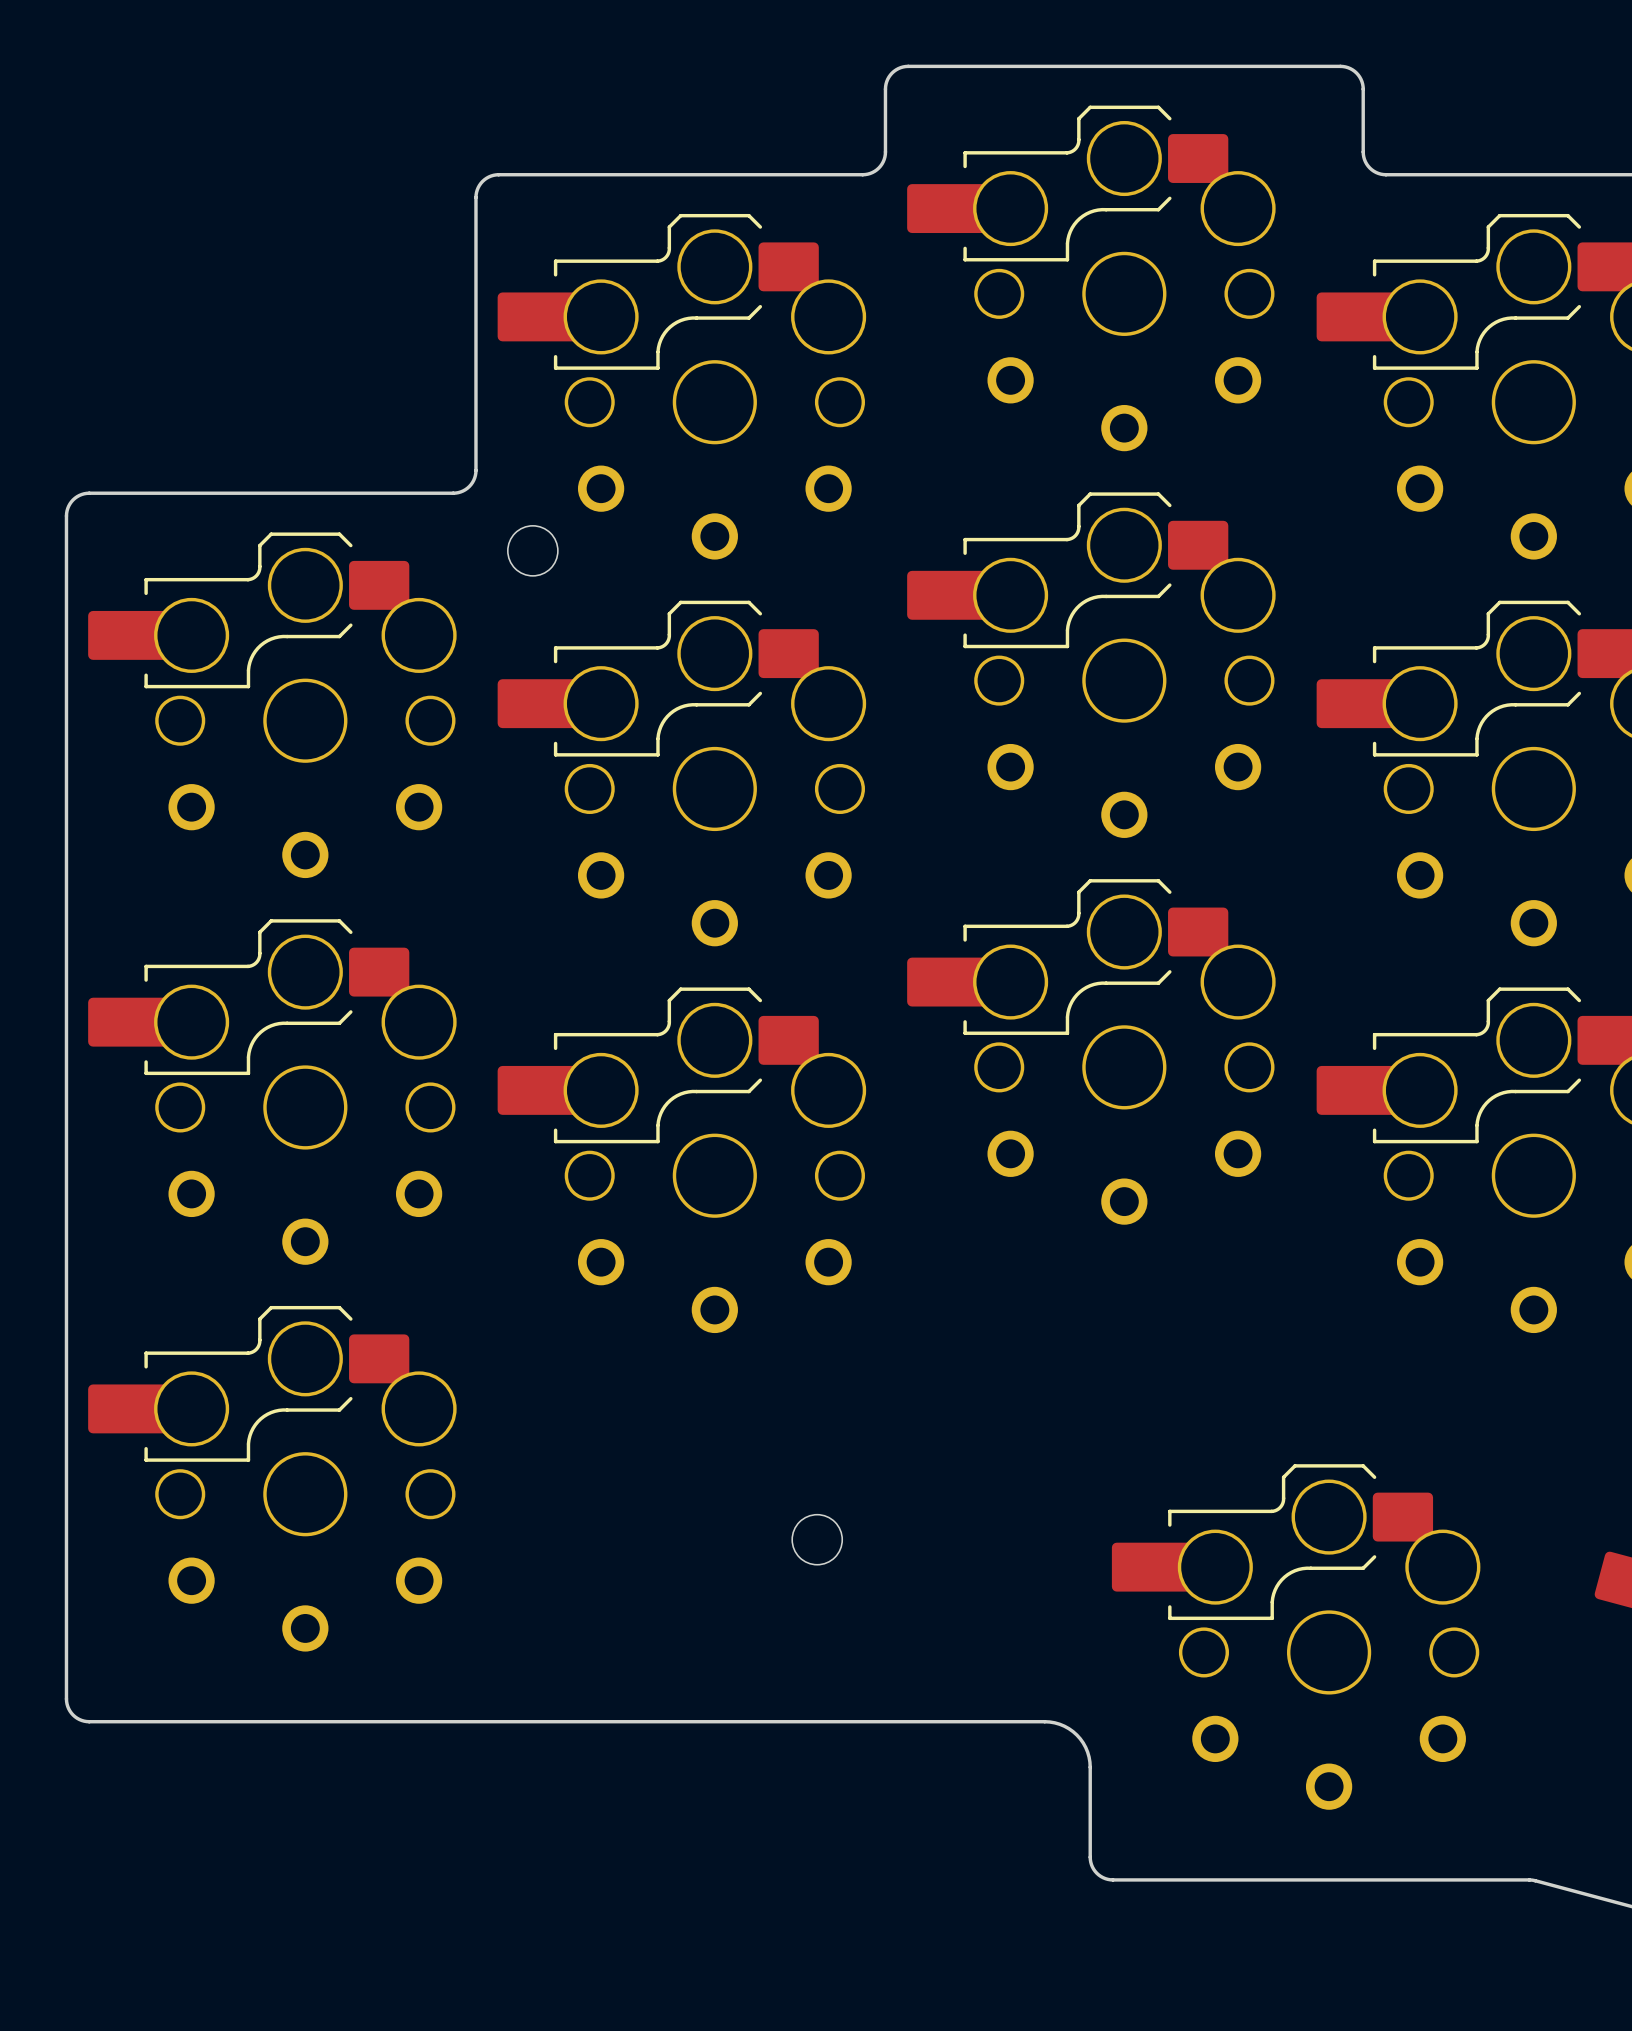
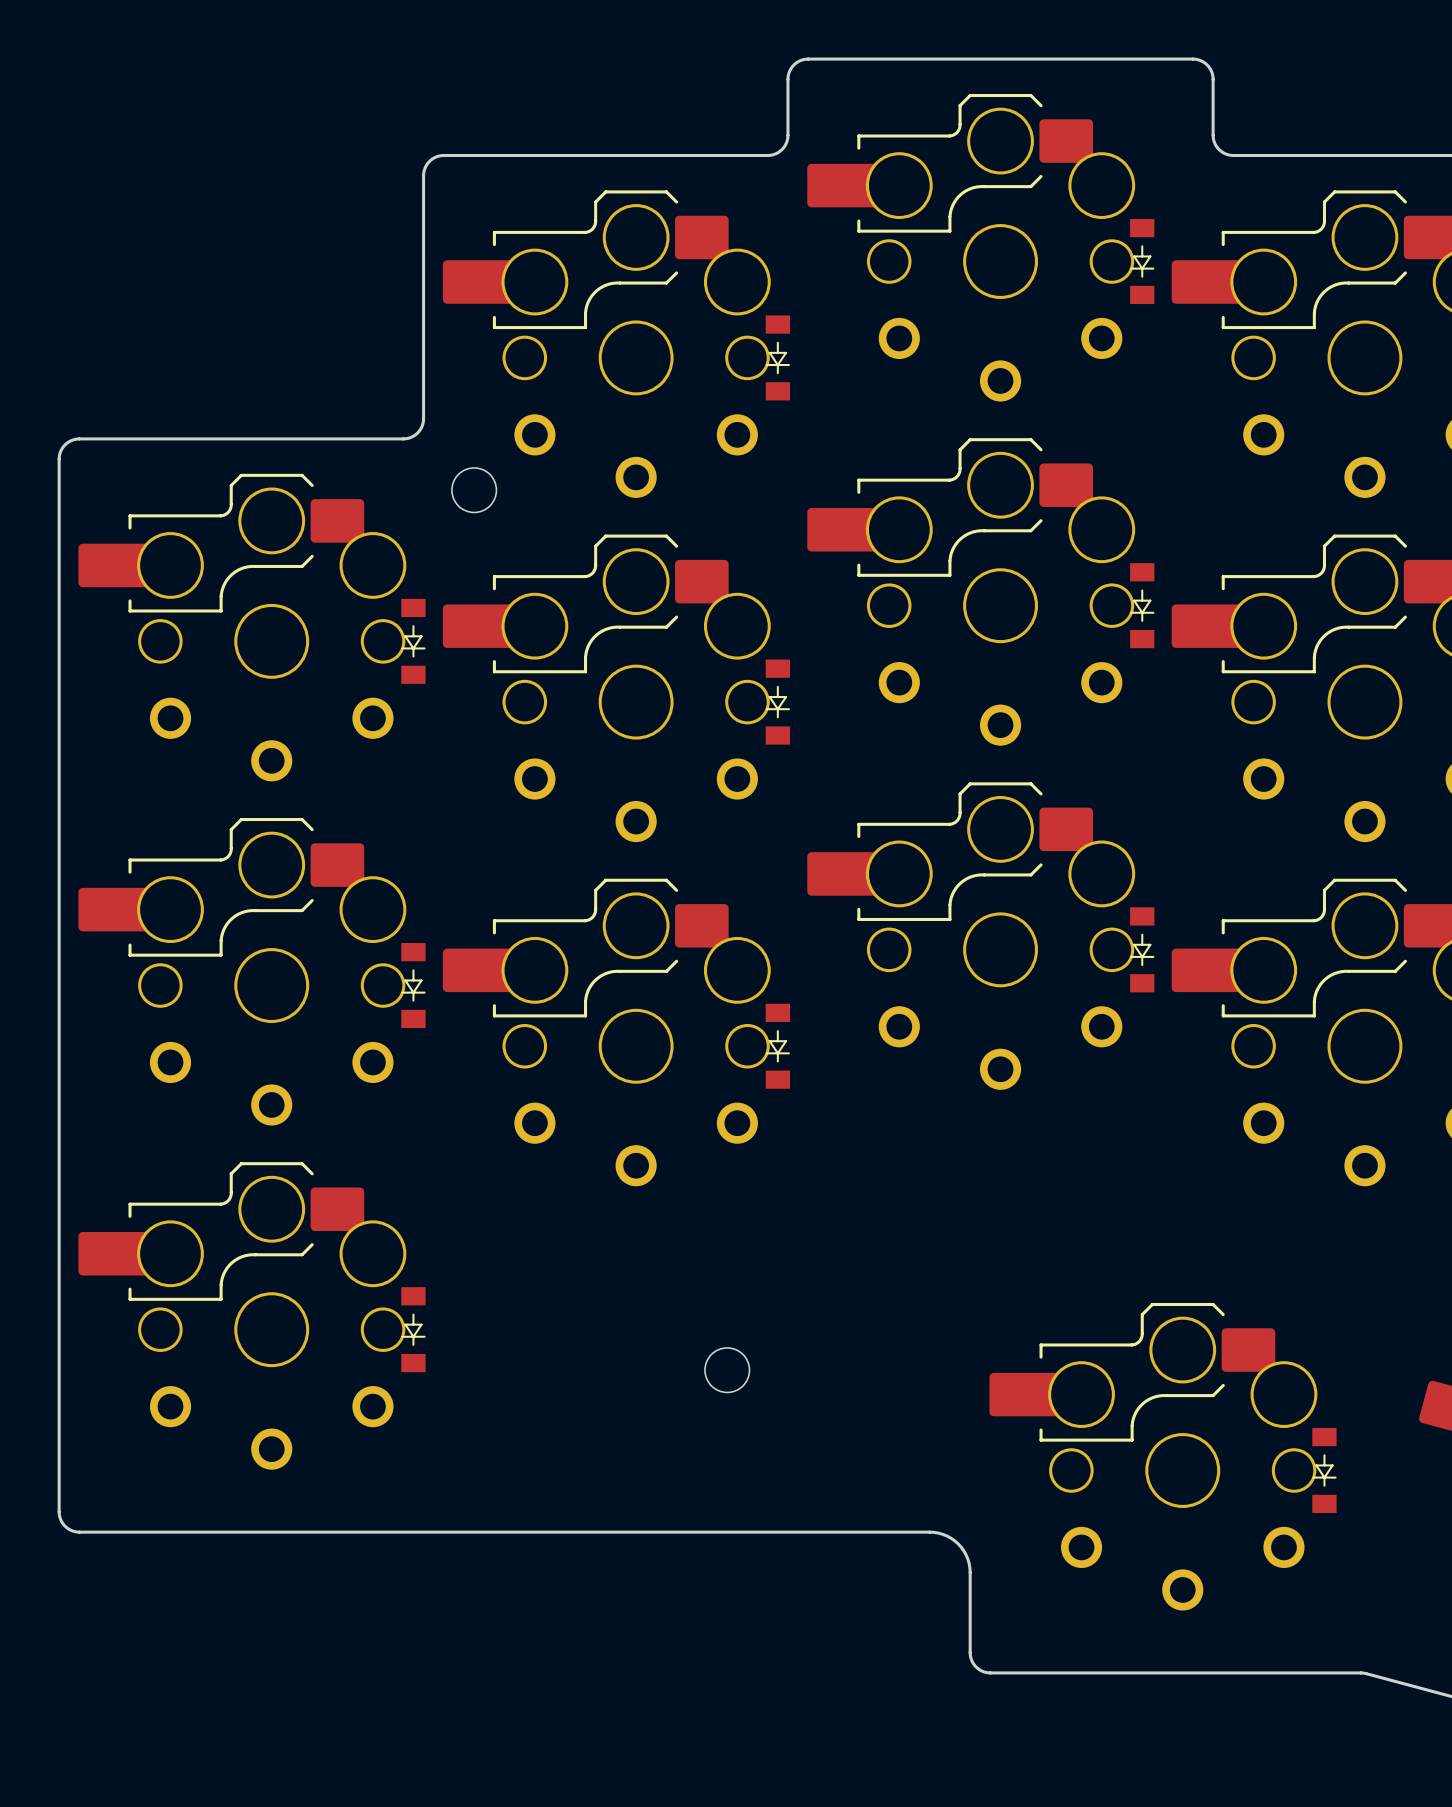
part: none -> (1142, 261)
part: none -> (777, 357)
part: none -> (1142, 605)
part: none -> (413, 641)
part: none -> (777, 702)
part: none -> (1142, 949)
part: none -> (413, 985)
part: none -> (777, 1046)
part: none -> (413, 1329)
part: none -> (1324, 1470)

